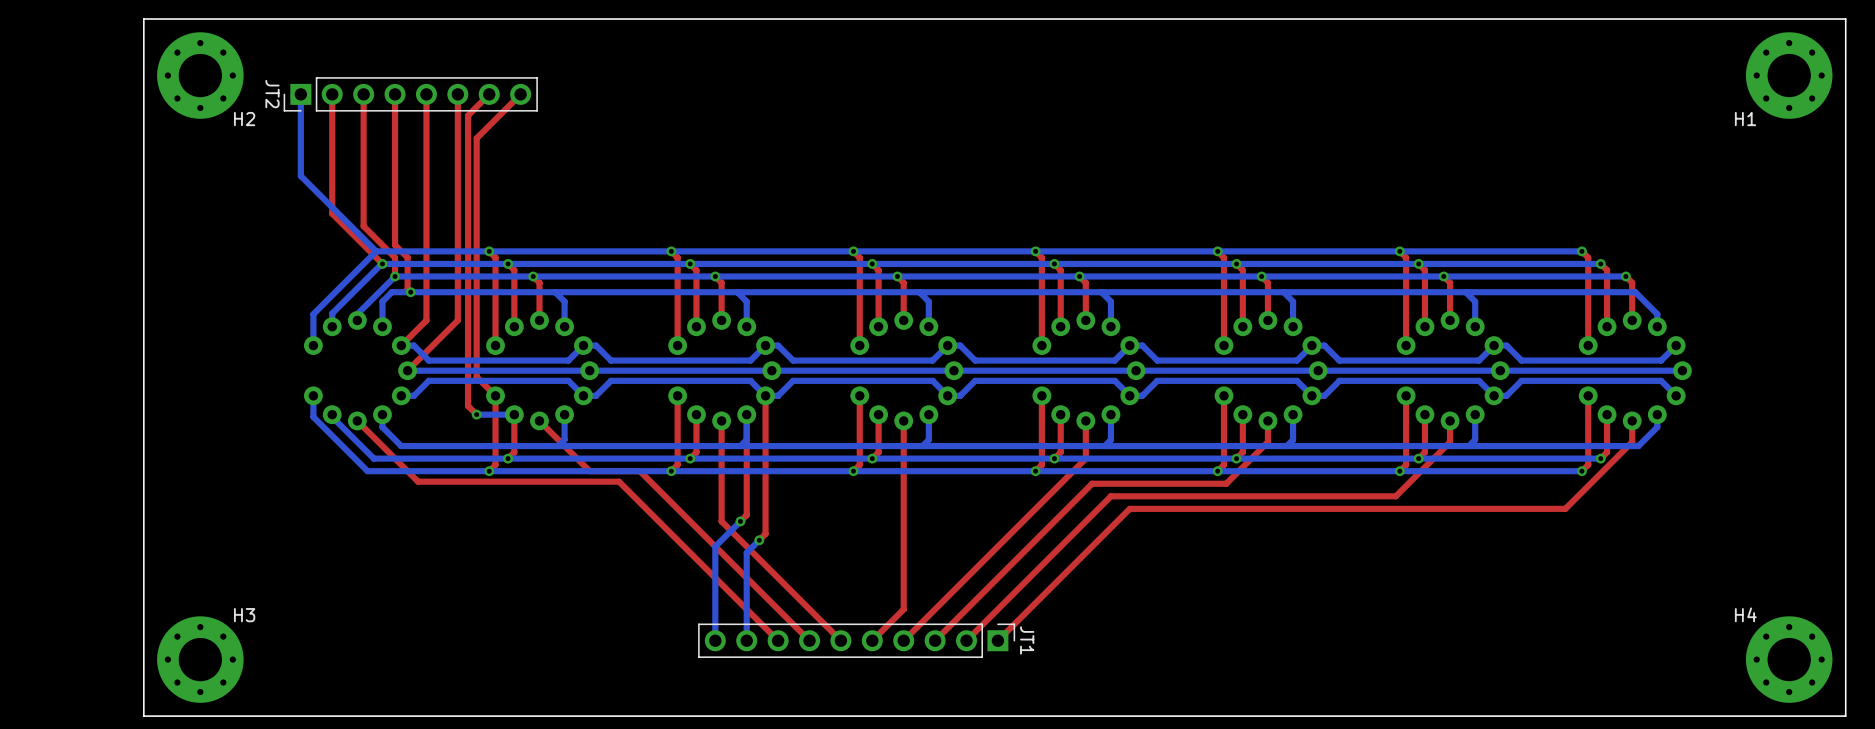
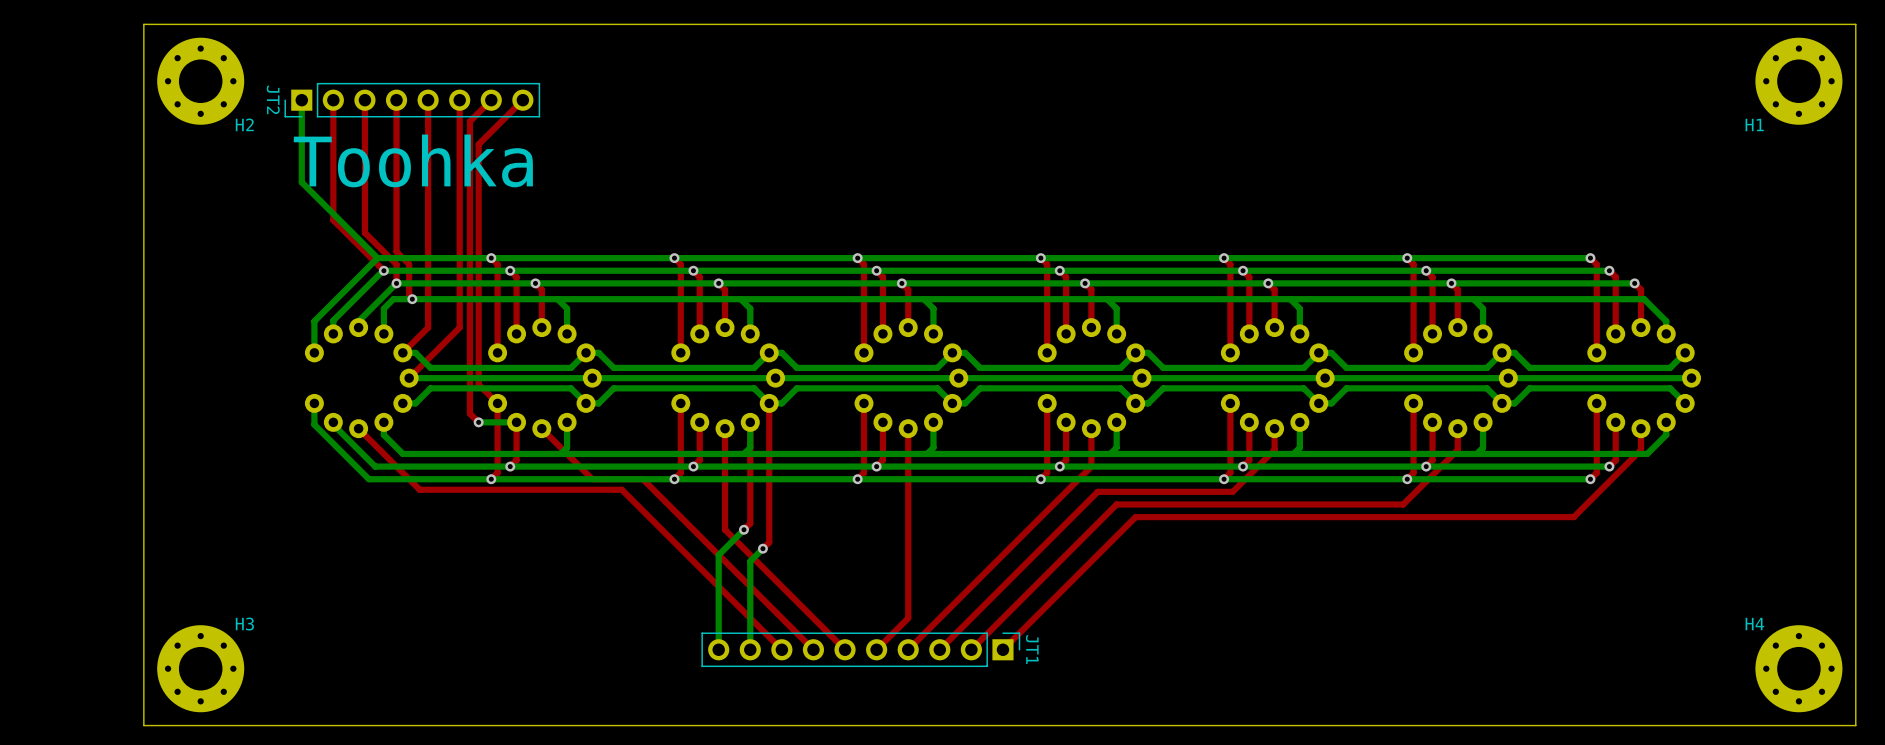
text: none -> Toohka (413, 160)

